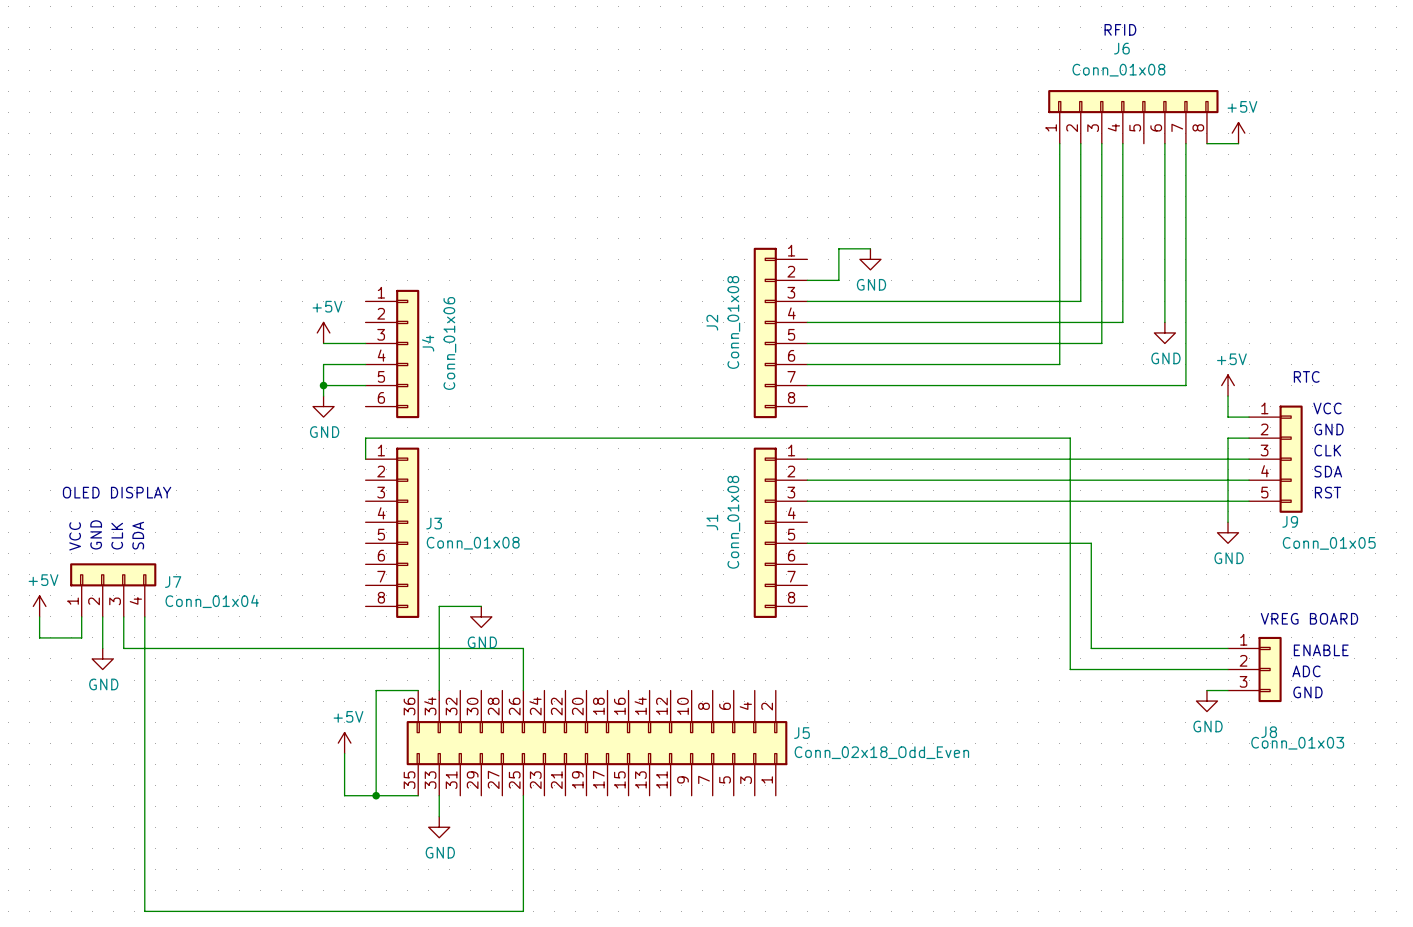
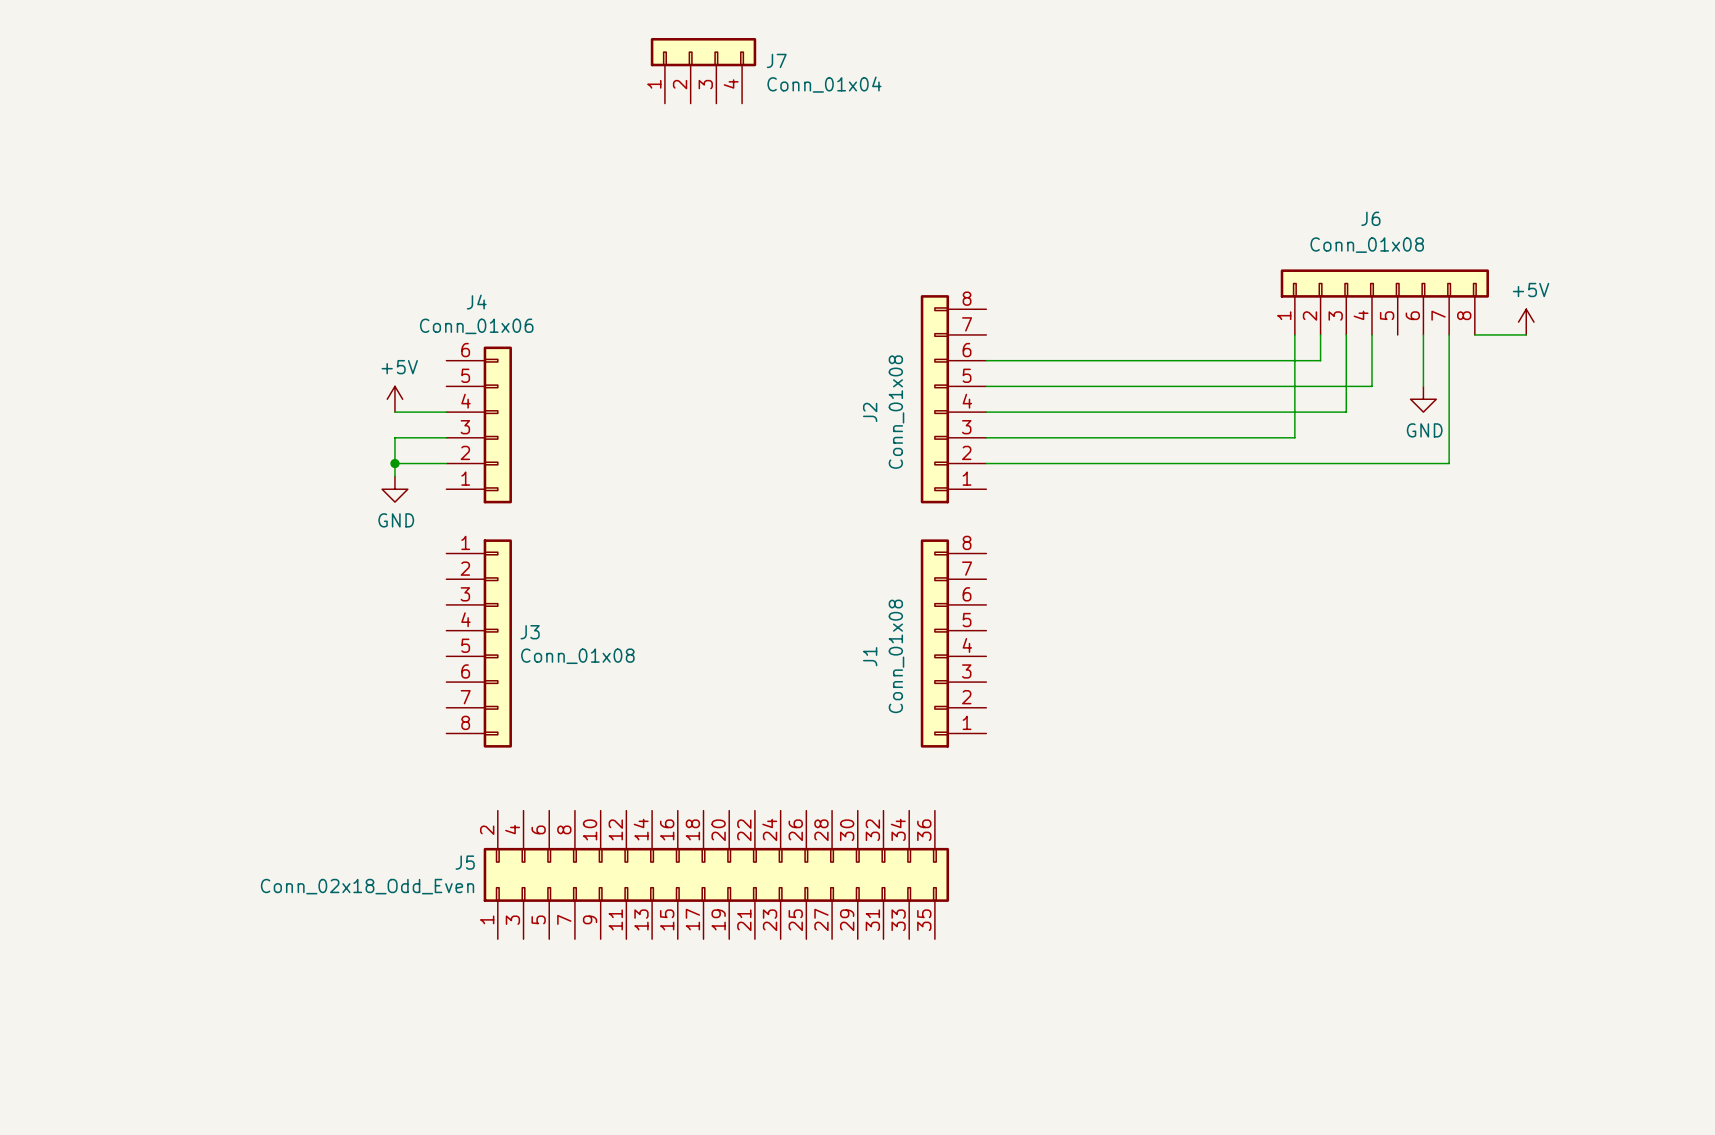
text: RFID (1120, 29) -> none
J6 position: (1133, 116) -> (1384, 302)
power symbol: +5V (1238, 133) -> none
wire: (1059, 143) (1059, 280) -> none
wire: (1080, 143) (1080, 280) -> none
wire: (1101, 143) (1101, 280) -> none
wire: (1122, 143) (1122, 280) -> none
wire: (1164, 143) (1164, 280) -> none
wire: (1185, 143) (1185, 280) -> none
wire: (1206, 143) (1238, 143) -> none
wire: (870, 248) (838, 248) (838, 280) (807, 280) -> none
power symbol: GND (870, 259) -> none
power symbol: none -> +5V (1526, 322)
wire: none -> (1474, 334) (1526, 334)
J2 flip: as is (765, 332) -> up-down (934, 399)
J4 name position: J4 (428, 343) -> J4 (476, 302)
J4 value position: Conn_01x06 (449, 343) -> Conn_01x06 (476, 326)
J4 flip: as is (407, 354) -> up-down (497, 424)
text: RTC (1306, 376) -> none
power symbol: +5V (1228, 385) -> none
wire: (1228, 396) (1228, 417) (1249, 417) -> none
text: VCC (1327, 408) -> none
text: GND (1329, 429) -> none
wire: (1249, 438) (1228, 438) (1228, 522) -> none
text: CLK (1327, 450) -> none
wire: (365, 459) (365, 438) (1070, 438) (1070, 669) (1228, 669) -> none
wire: (807, 459) (1249, 459) -> none
J9: Conn_01x05 (1275, 459) -> none
text: SDA (1328, 471) -> none
wire: (807, 480) (1249, 480) -> none
text: OLED DISPLAY (117, 492) -> none
text: RST (1327, 492) -> none
wire: (807, 501) (1249, 501) -> none
J1 flip: as is (765, 532) -> up-down (934, 643)
power symbol: GND (1228, 532) -> none
text: GND (96, 534) -> none
text: SDA (138, 535) -> none
text: VCC (75, 536) -> none
text: CLK (117, 536) -> none
wire: (807, 543) (1091, 543) (1091, 648) (1228, 648) -> none
J7 position: (113, 590) -> (703, 70)
power symbol: +5V (39, 606) -> none
wire: (481, 606) (439, 606) (439, 690) -> none
wire: (39, 616) (39, 637) (81, 637) (81, 616) -> none
wire: (102, 616) (102, 648) -> none
wire: (123, 616) (123, 648) (523, 648) (523, 690) -> none
wire: (144, 616) (144, 911) (523, 911) (523, 795) -> none
power symbol: GND (481, 616) -> none
text: VREG BOARD (1309, 618) -> none
text: ENABLE (1321, 650) -> none
power symbol: GND (102, 658) -> none
J8: Conn_01x03 (1254, 669) -> none
text: ADC (1306, 671) -> none
wire: (418, 690) (376, 690) (376, 795) -> none
wire: (1206, 690) (1228, 690) -> none
text: GND (1307, 692) -> none
power symbol: GND (1206, 701) -> none
power symbol: +5V (344, 743) -> none
J5 flip: as is (597, 743) -> left-right (716, 874)
wire: (344, 753) (344, 795) (418, 795) -> none
junction: (376, 795) -> none
wire: (439, 795) (439, 816) -> none
power symbol: GND (439, 827) -> none

